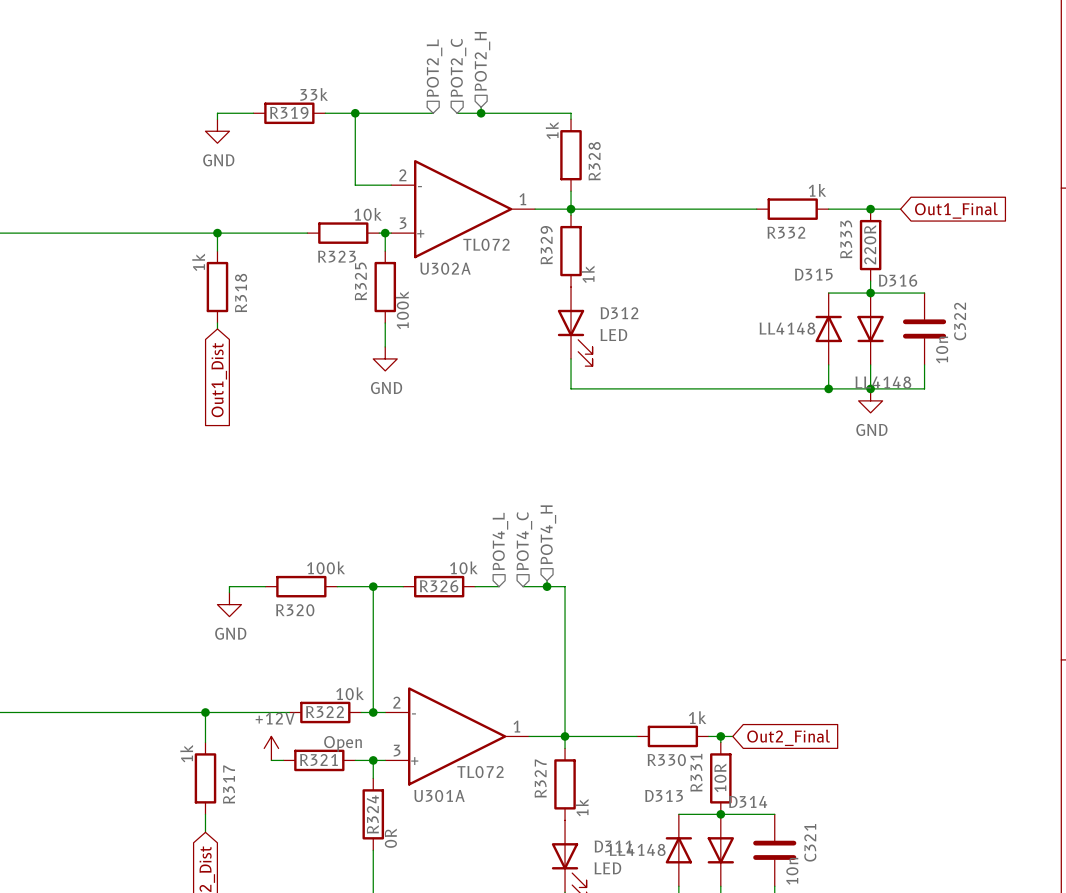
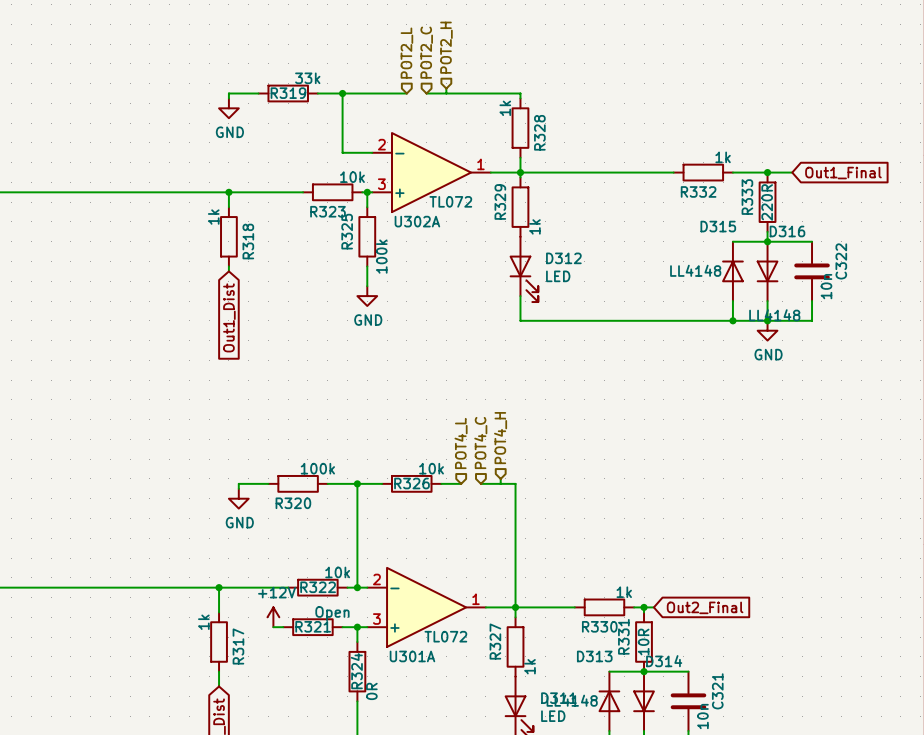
junction: (481, 113) -> none
junction: (547, 586) -> none

